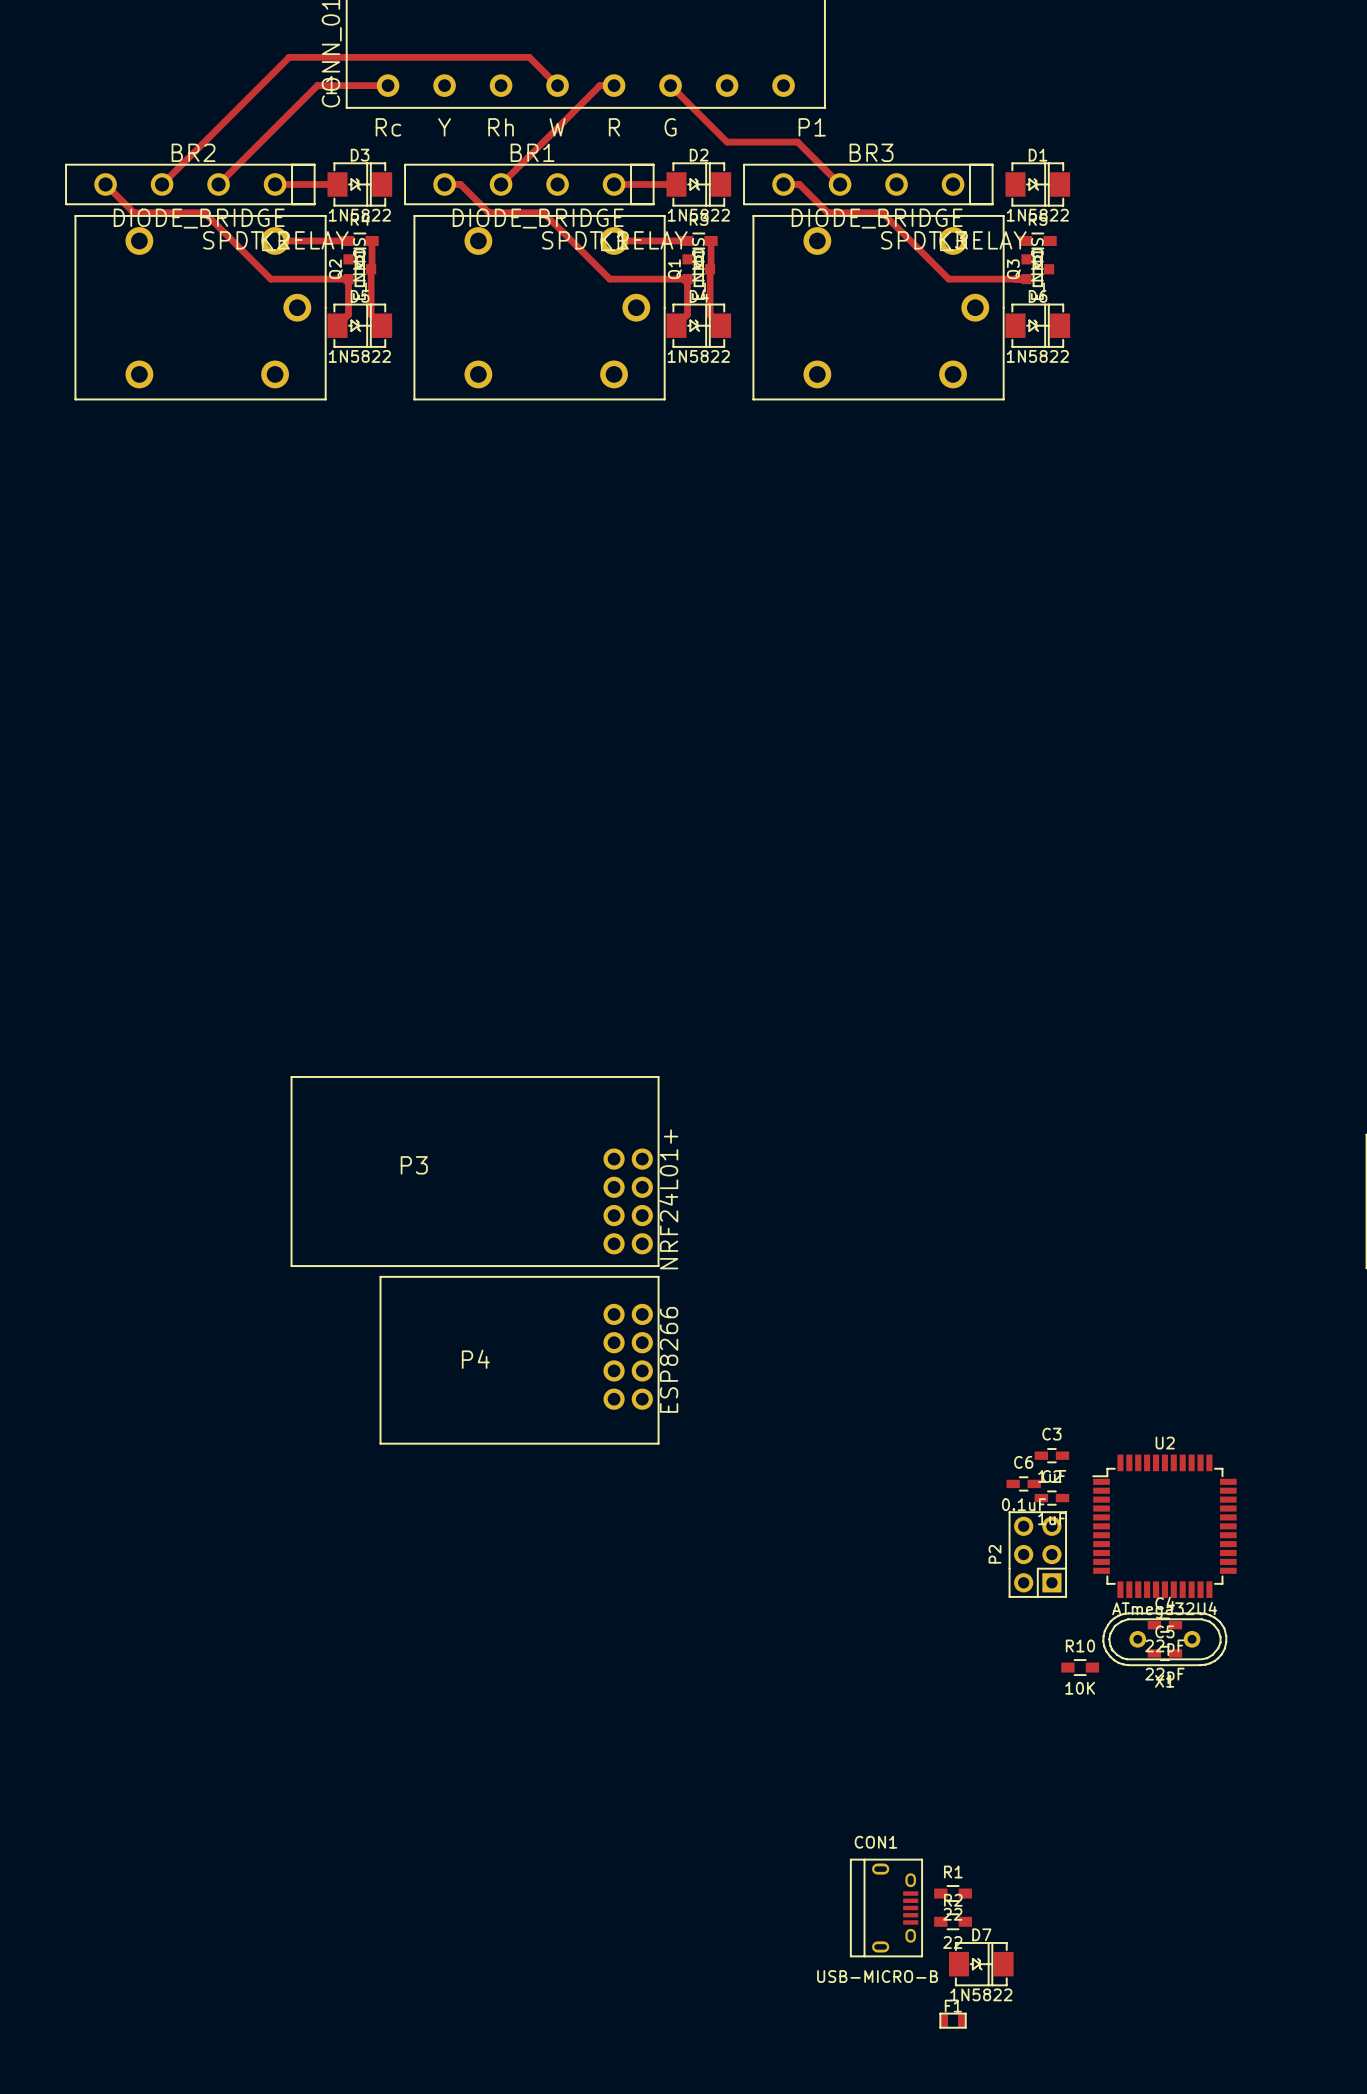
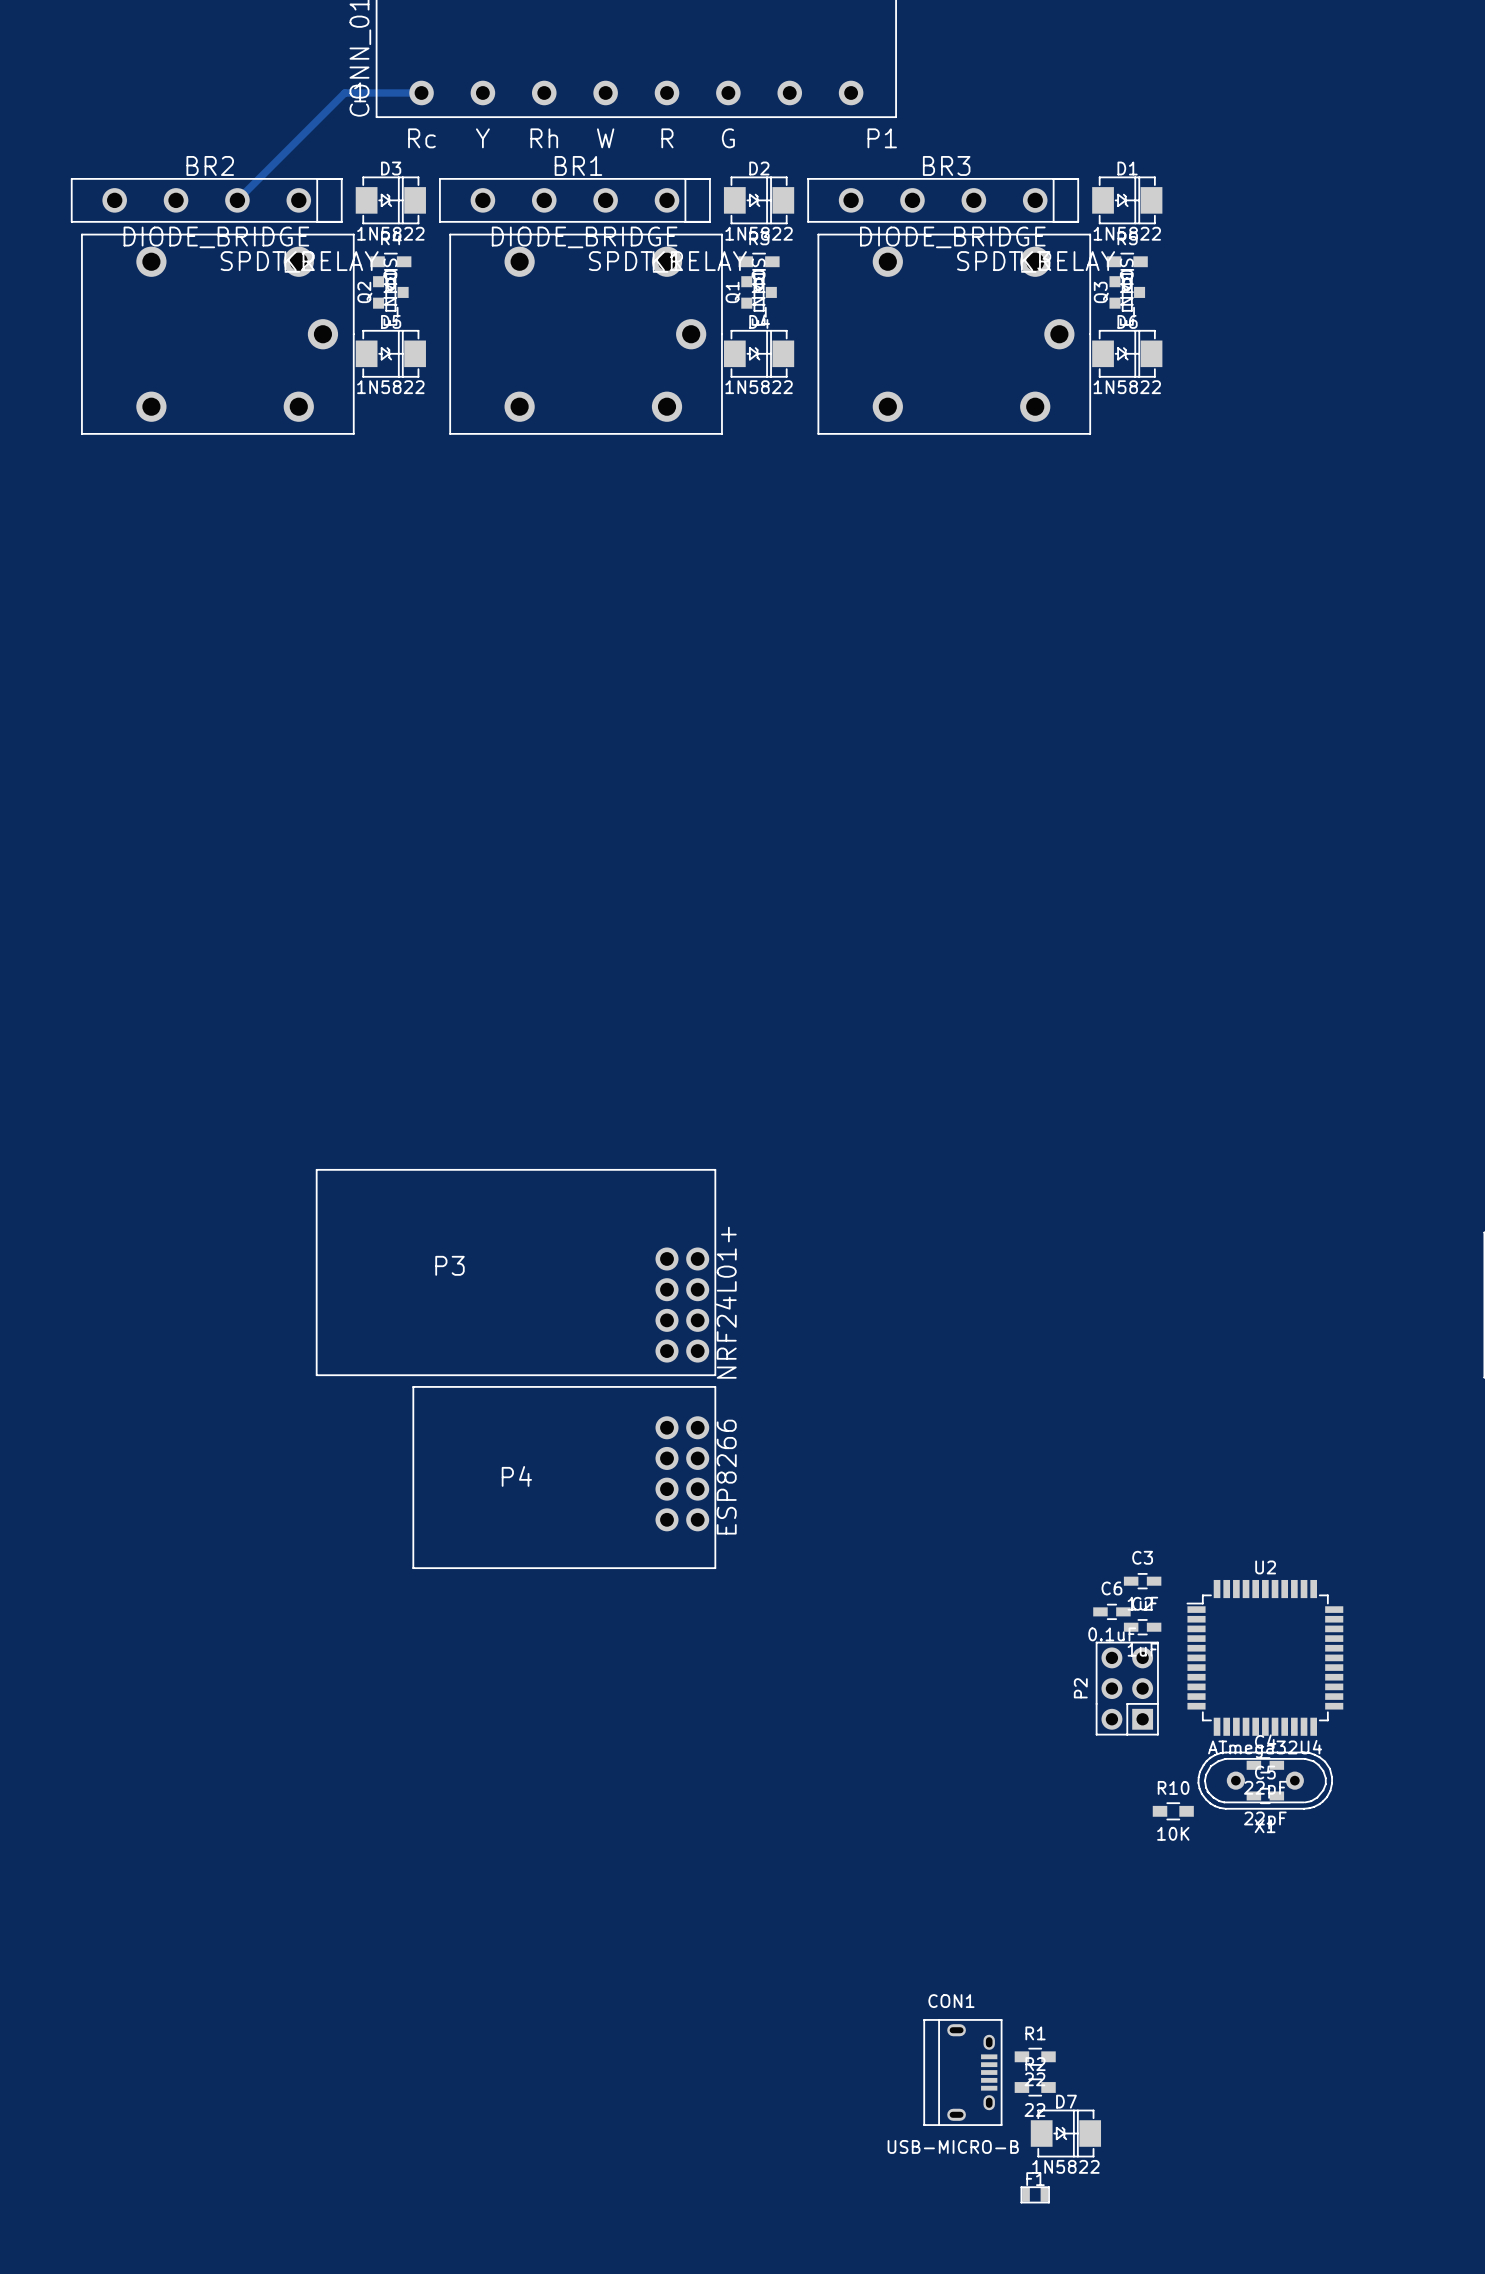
track: (557, 85) (529, 57) (289, 57) (162, 184) -> none
track: (614, 85) (599, 85) (501, 184) -> none
track: (670, 85) (727, 142) (797, 142) (840, 184) -> none
track: (105, 184) (133, 212) (204, 212) (270, 279) (348, 279) (348, 314) (337, 325) -> none
track: (275, 184) (337, 184) -> none
track: (444, 184) (460, 184) (488, 212) (543, 212) (609, 279) (687, 279) (687, 314) (676, 325) -> none
track: (614, 184) (676, 184) -> none
track: (783, 184) (799, 184) (827, 212) (882, 212) (948, 279) (1026, 279) -> none
track: (275, 240) (347, 240) -> none
track: (372, 240) (371, 314) (382, 325) -> none
track: (614, 240) (686, 240) -> none
track: (711, 240) (710, 314) (721, 325) -> none

